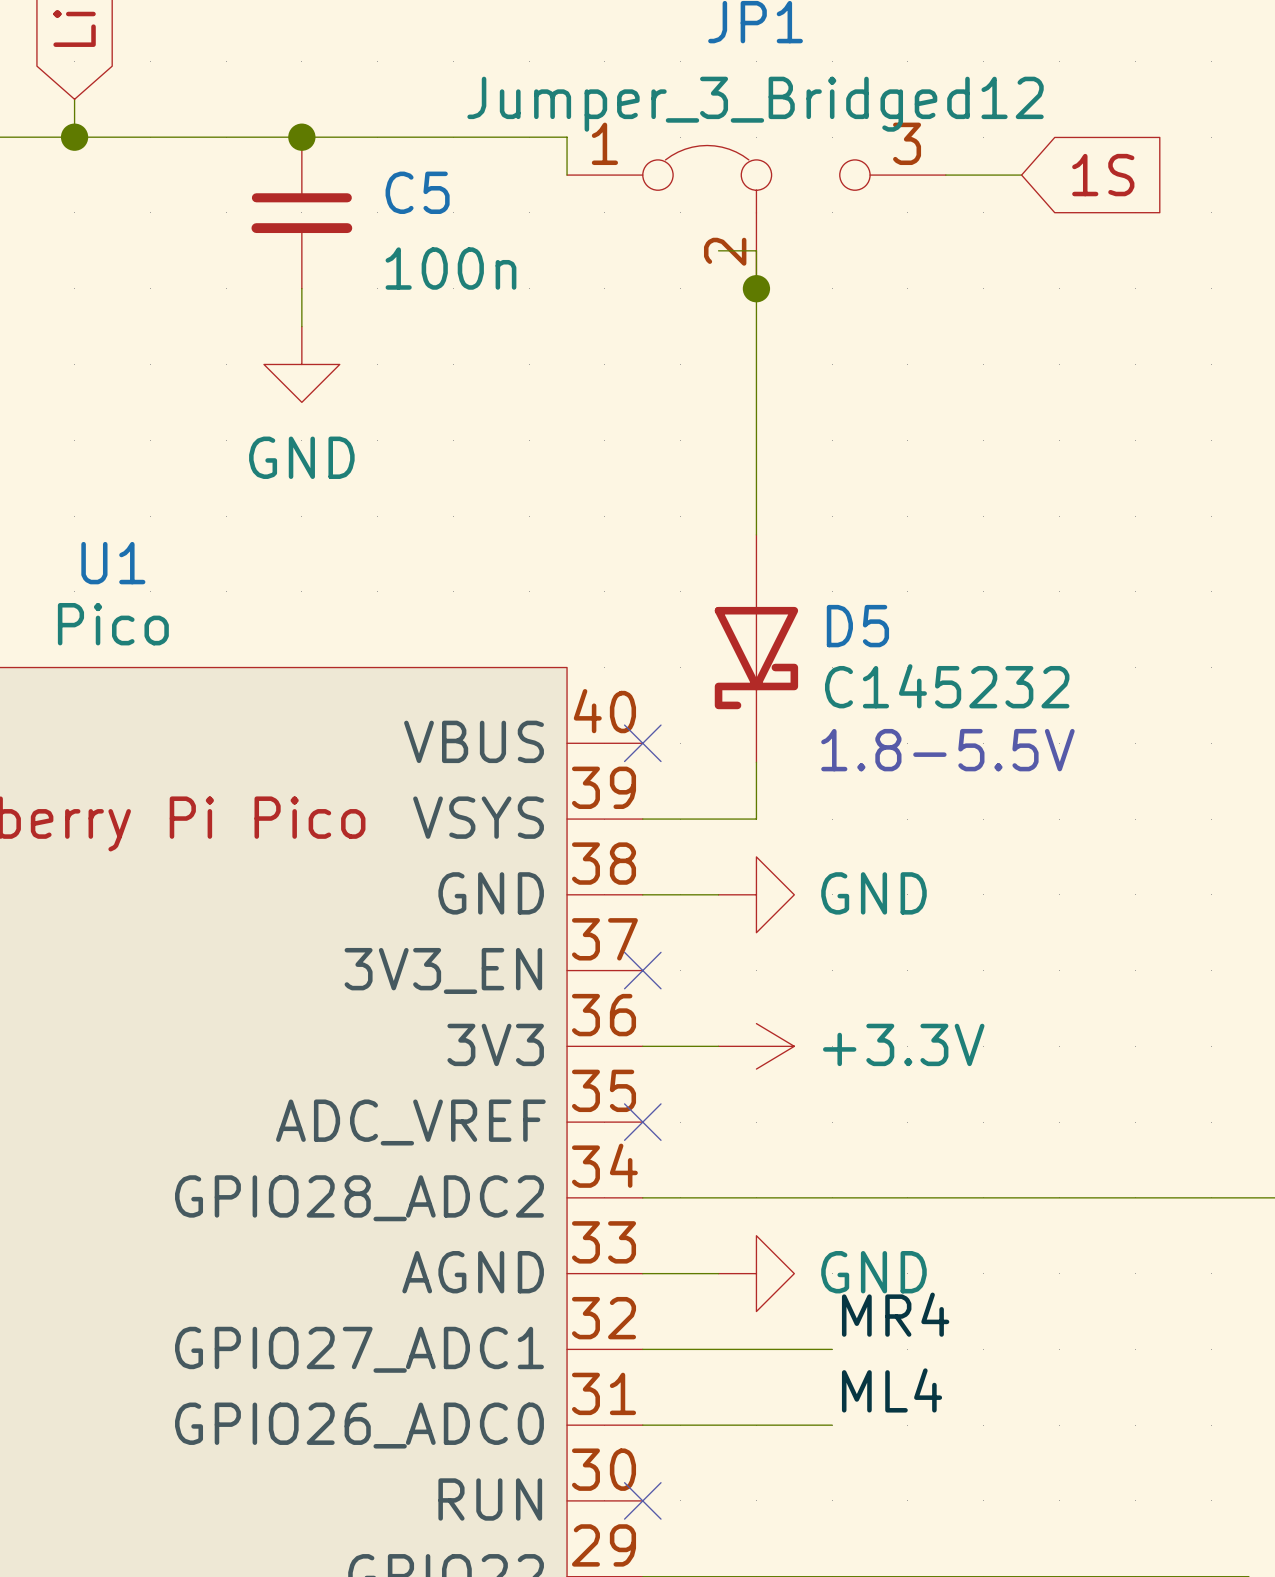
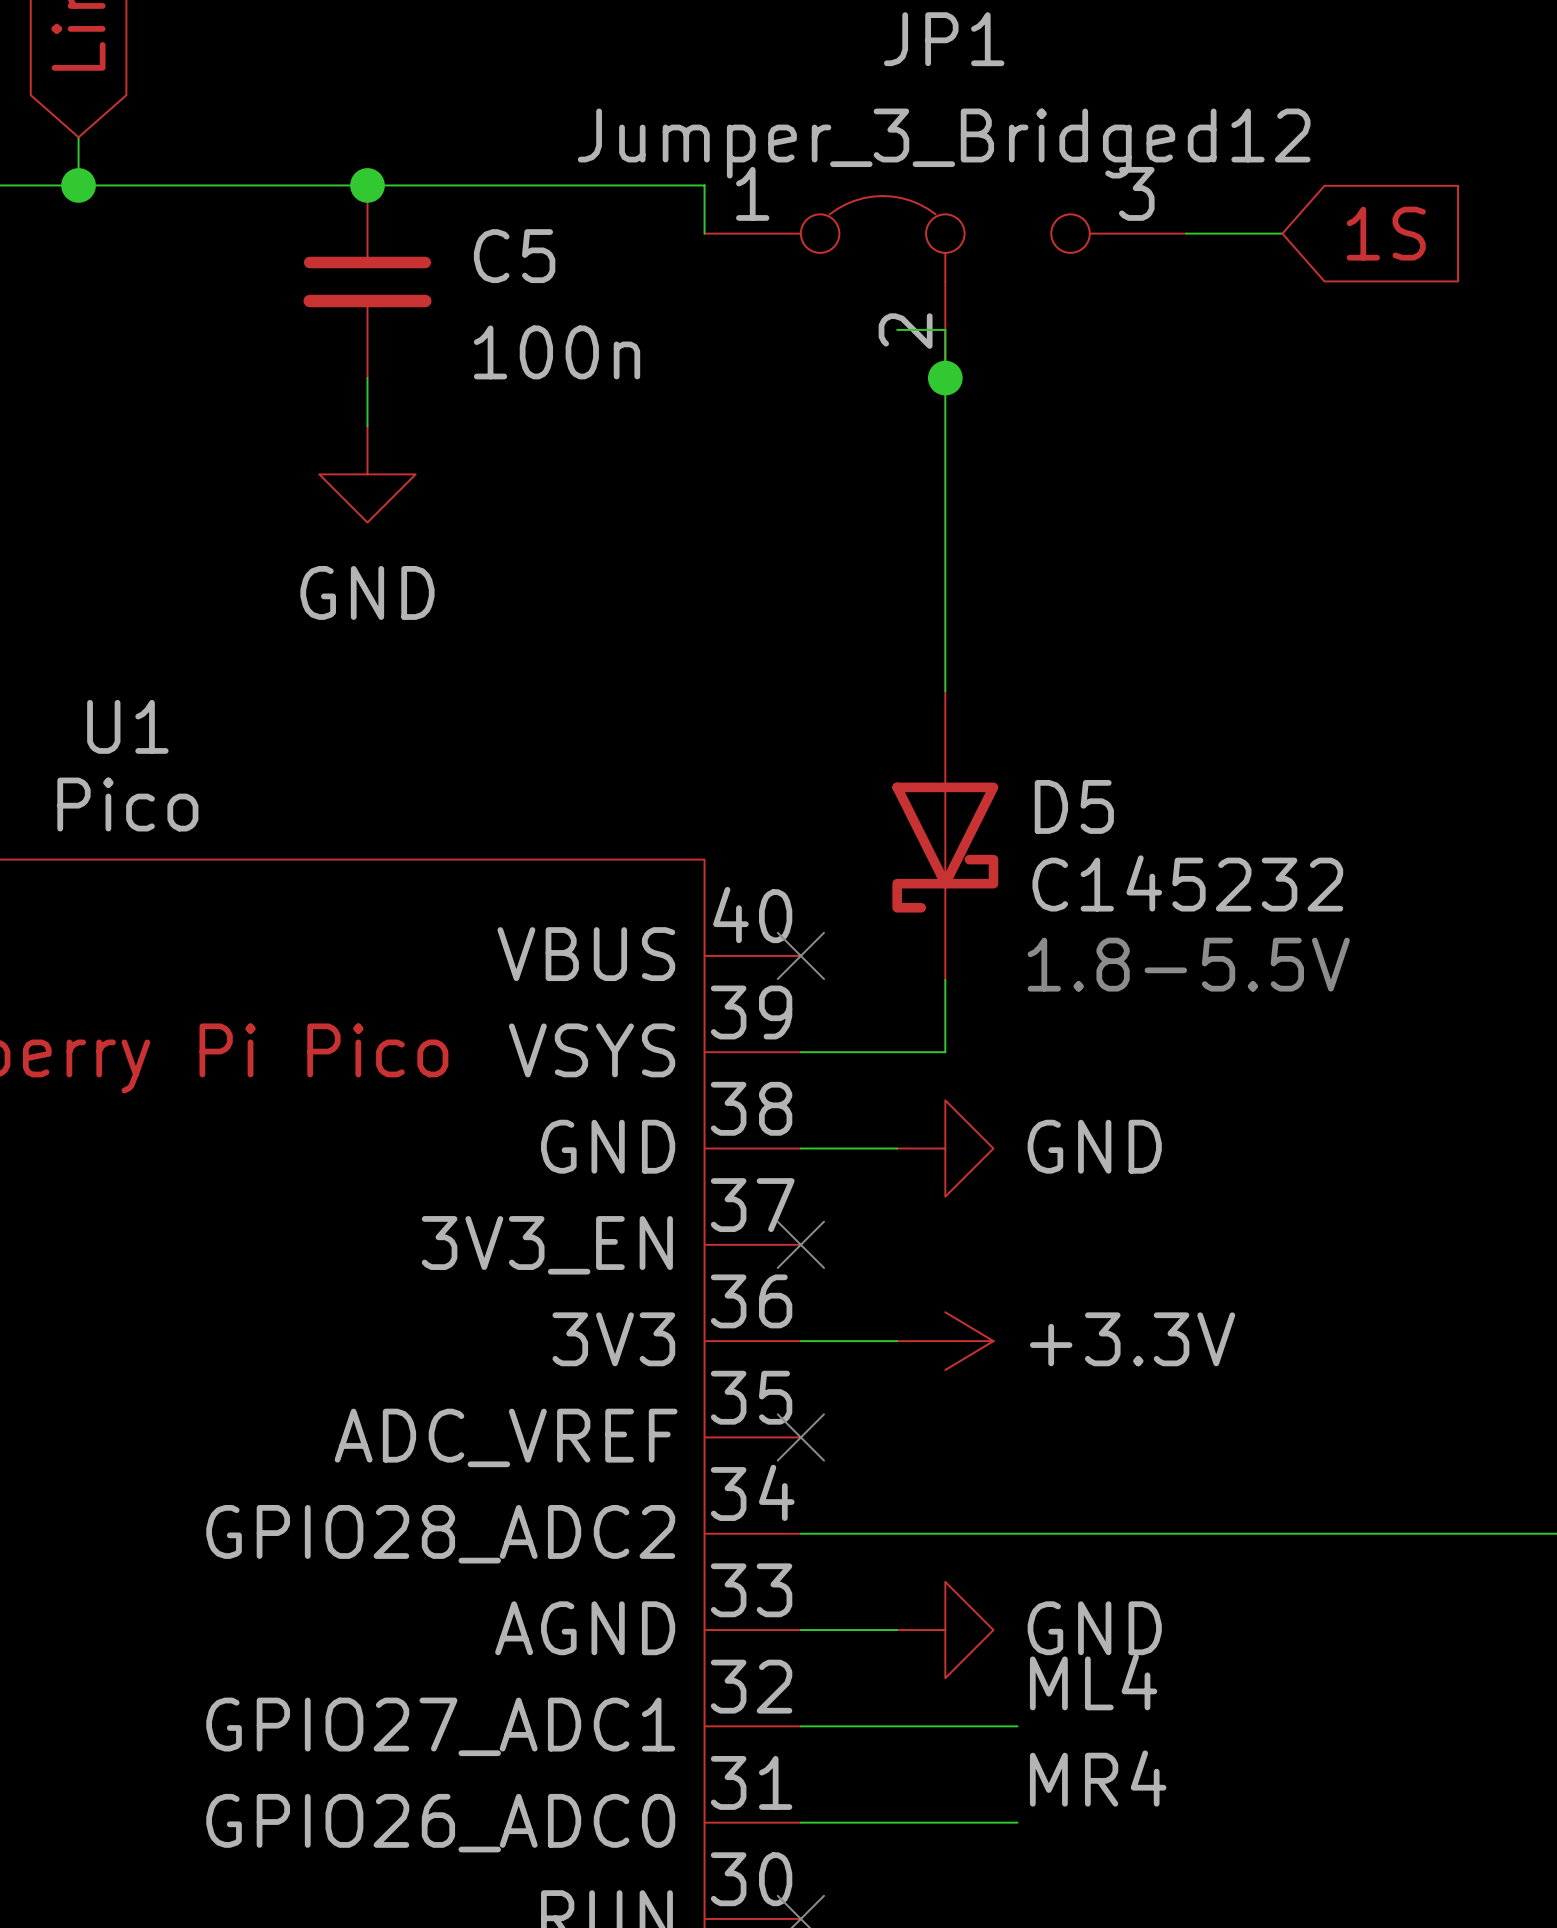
label position: MR4 (895, 1314) -> MR4 (1098, 1778)
wire: (813, 1349) (832, 1349) -> none
label position: ML4 (892, 1390) -> ML4 (1093, 1682)
wire: (813, 1425) (832, 1425) -> none

